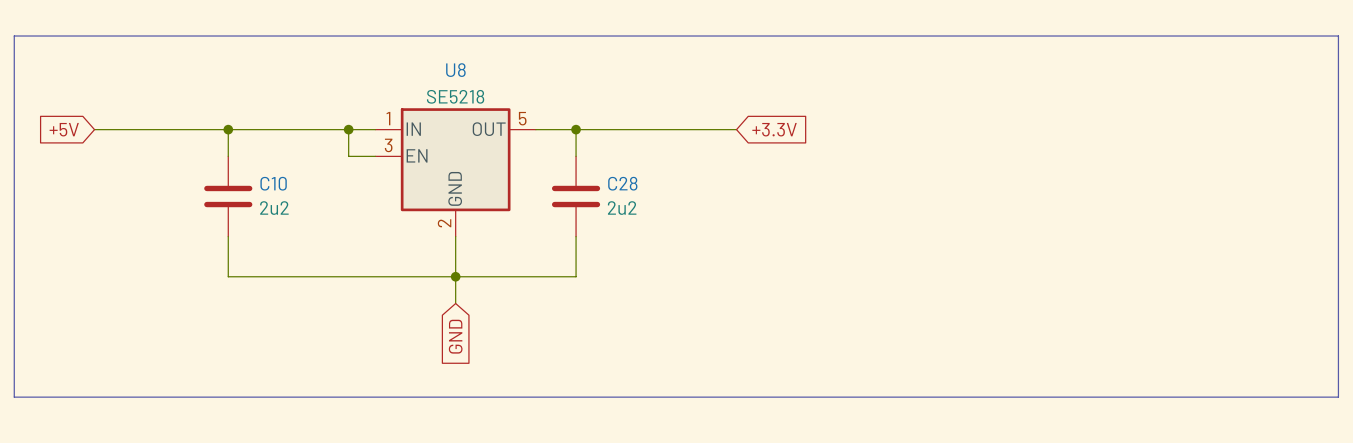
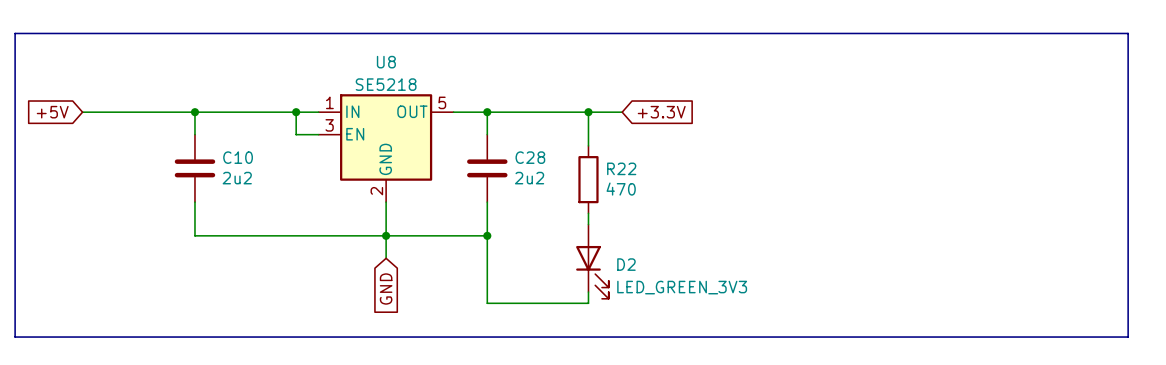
wire: none -> (588, 112) (588, 145)
junction: none -> (588, 112)
R22: none -> 470 (588, 179)
wire: none -> (588, 213) (588, 224)
wire: none -> (487, 235) (487, 303) (588, 303) (588, 292)
junction: none -> (487, 235)
D2: none -> LED_GREEN_3V3 (592, 261)

